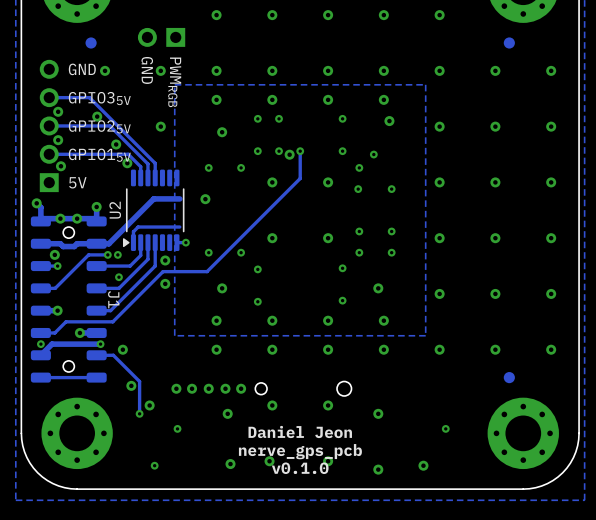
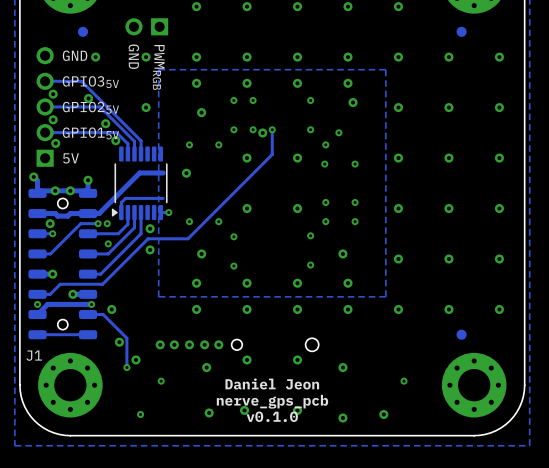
U2 name: U2 (115, 210) -> none
J1 name rotation: 0° (113, 299) -> 90° counterclockwise (34, 355)
J1 name position: J1 (113, 299) -> J1 (34, 355)

